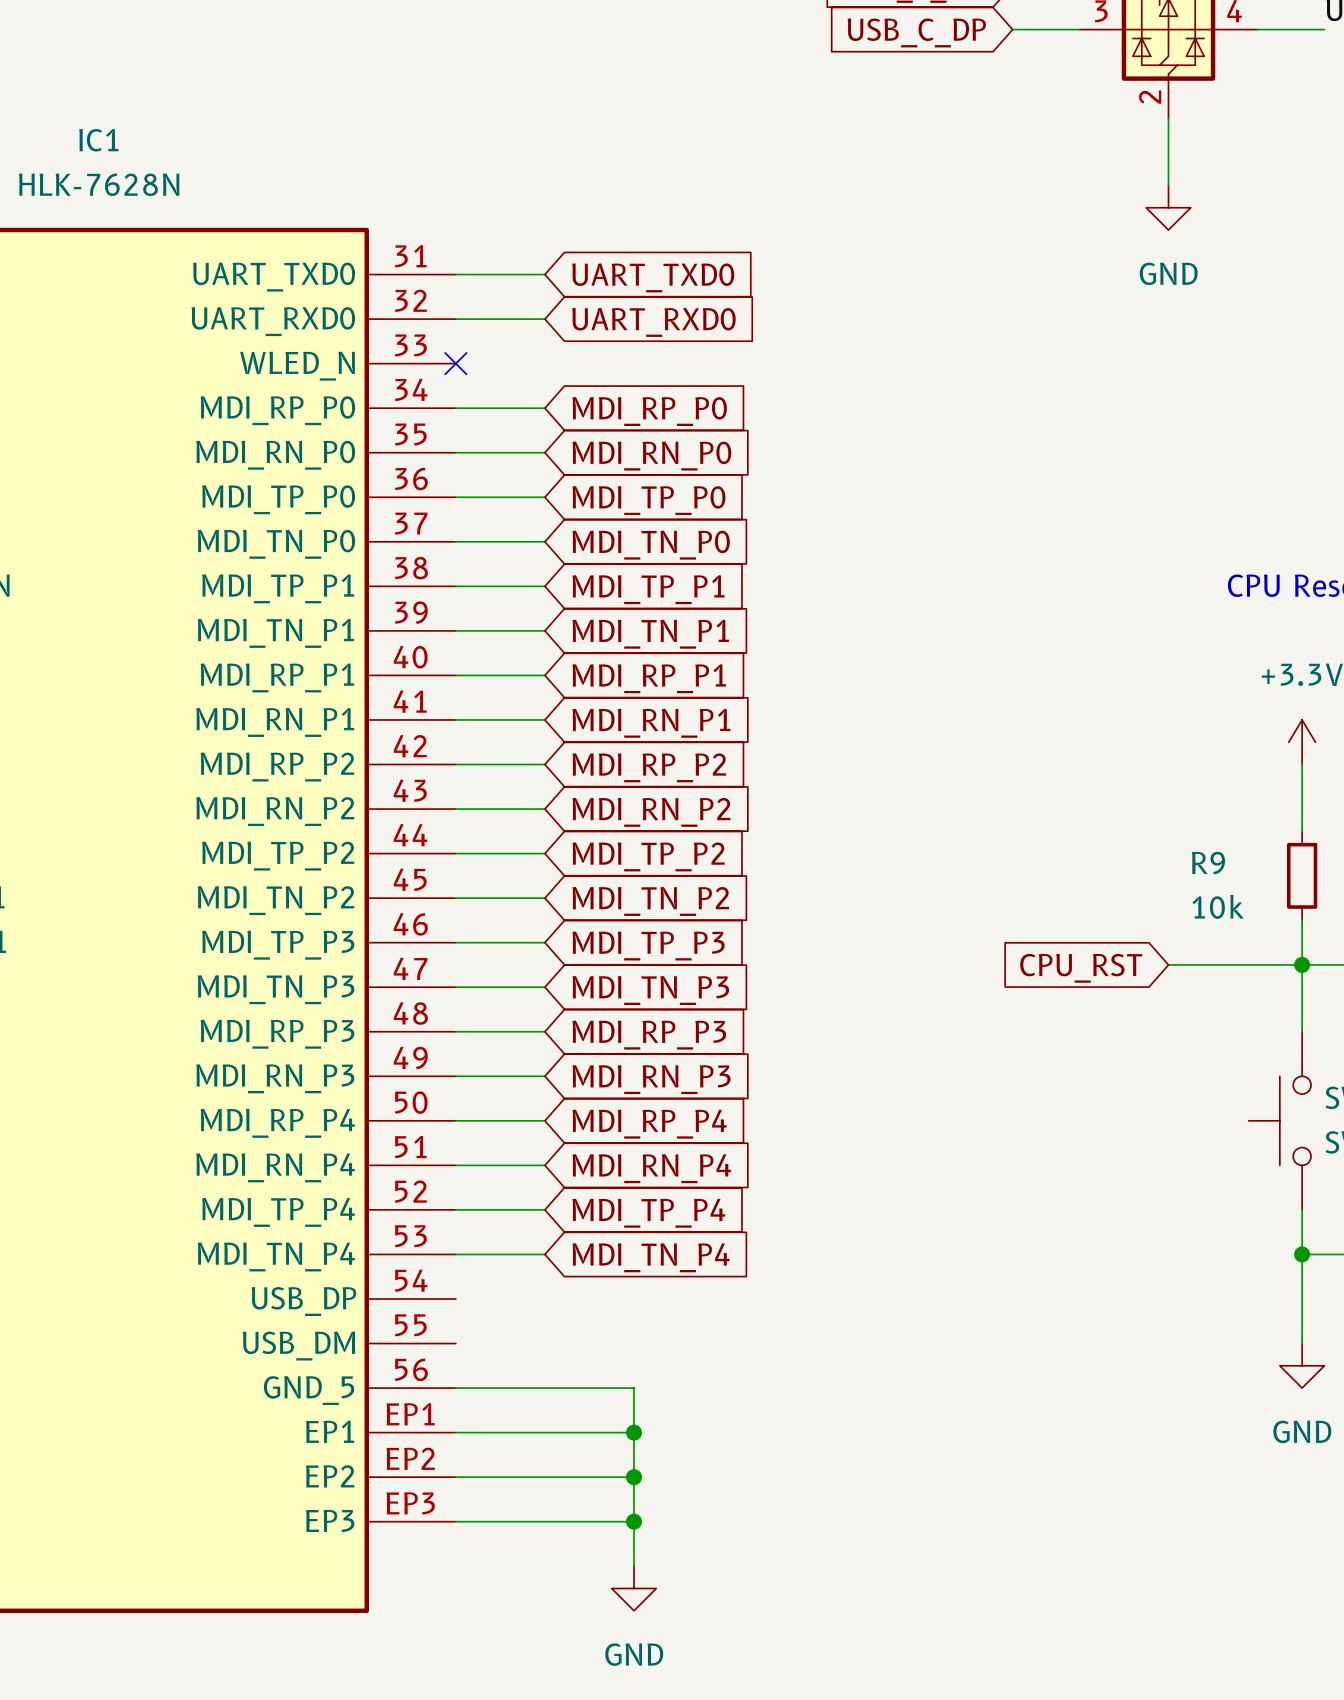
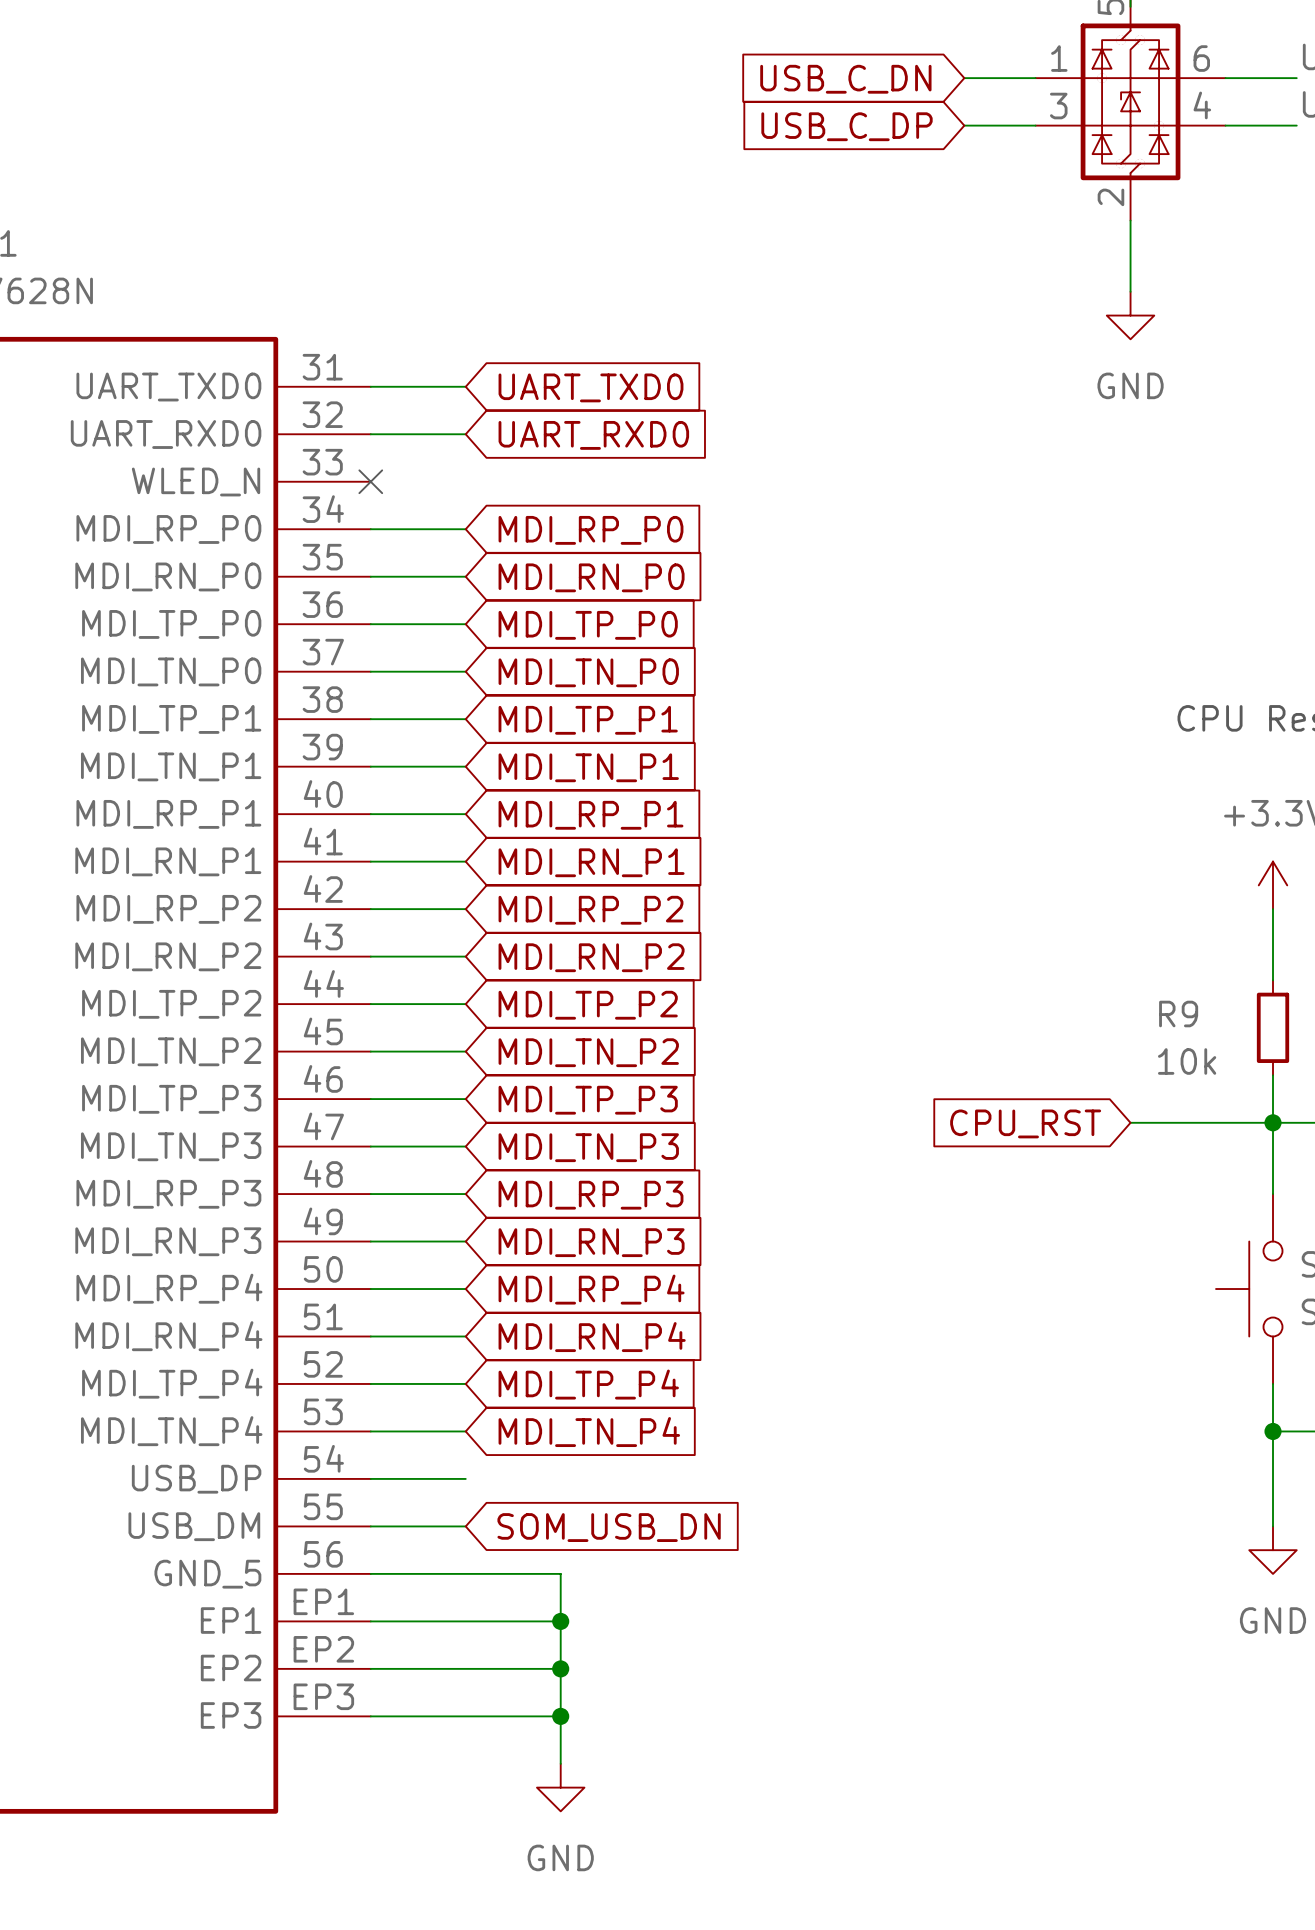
wire: none -> (370, 1478) (465, 1478)
wire: none -> (370, 1526) (465, 1526)
global label: none -> SOM_USB_DN (609, 1527)

